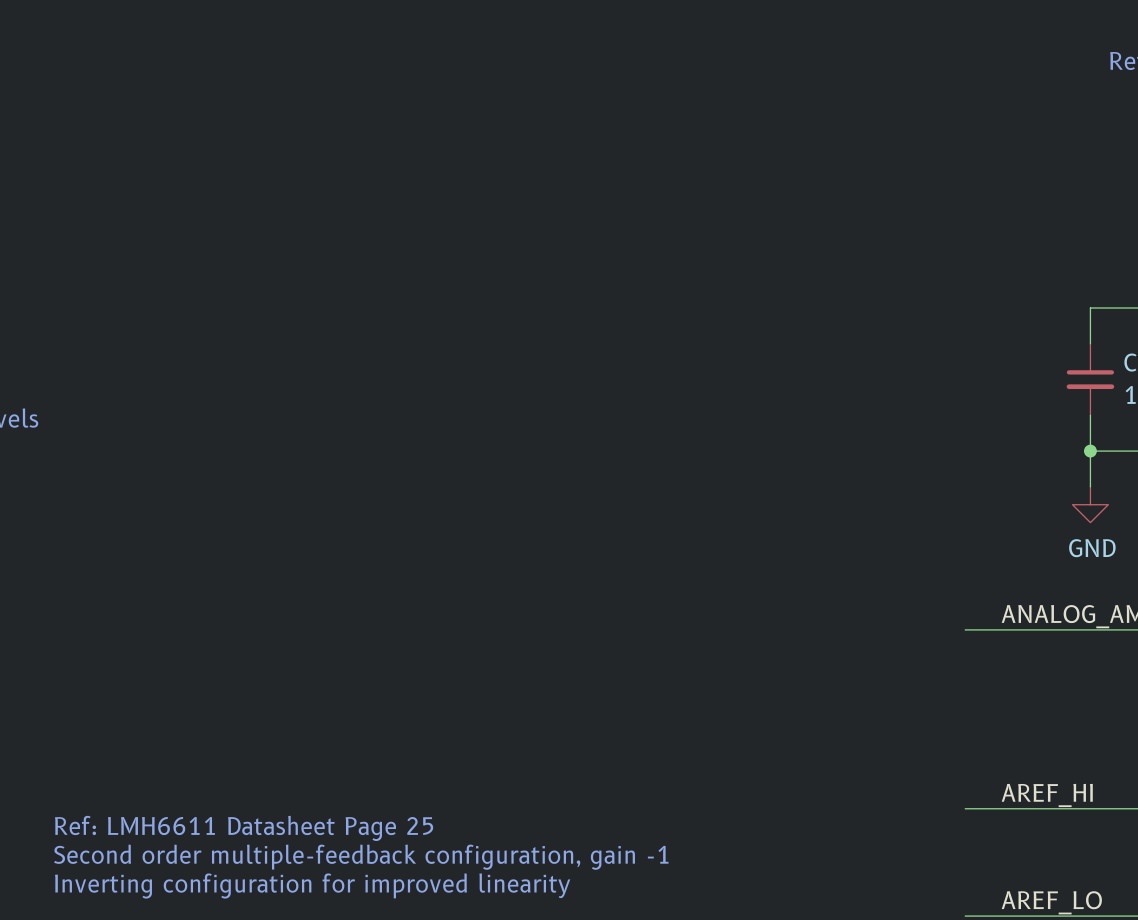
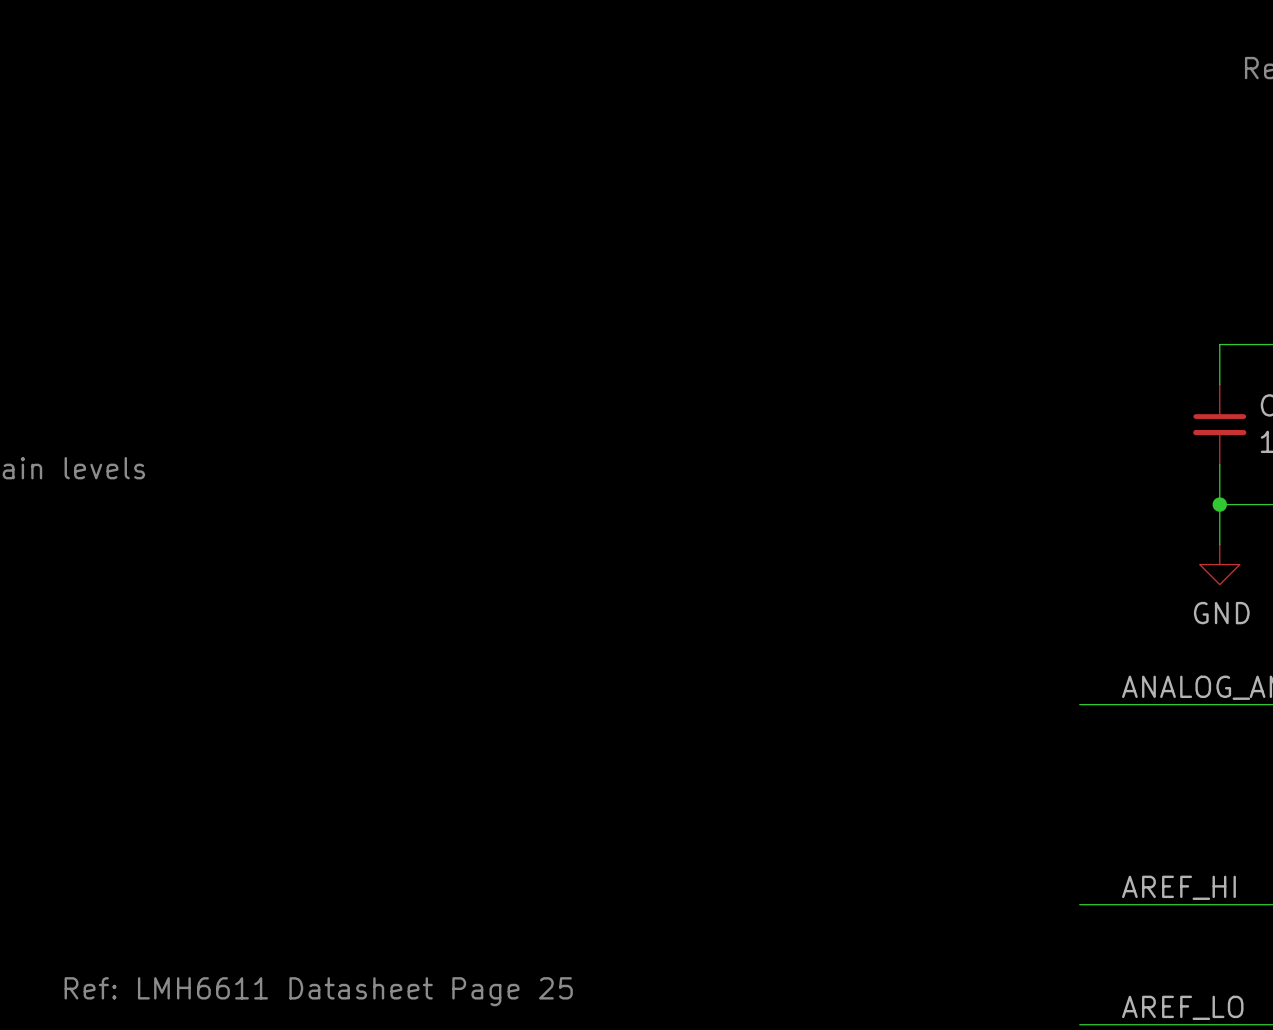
text: Ref: LMH6611 Datasheet Page 25 (244, 828) -> none
text: Second order multiple-feedback configuration, gain -1 (361, 857) -> none
text: Inverting configuration for improved linearity (312, 885) -> Ref: LMH6611 Datasheet Page 25 (318, 991)

